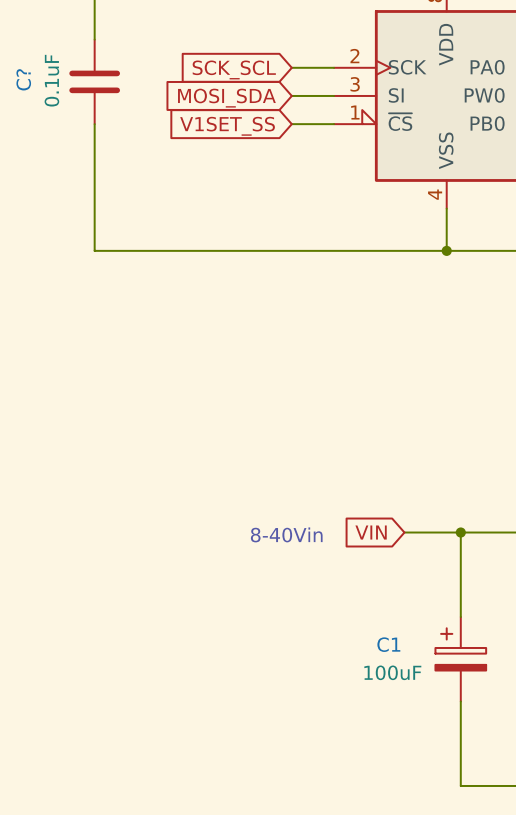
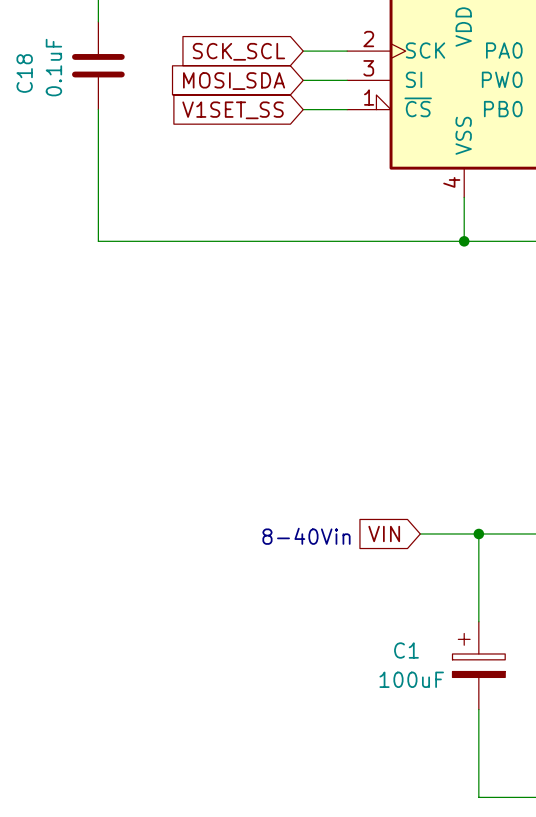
C? name: C? (23, 79) -> C18 (24, 73)

